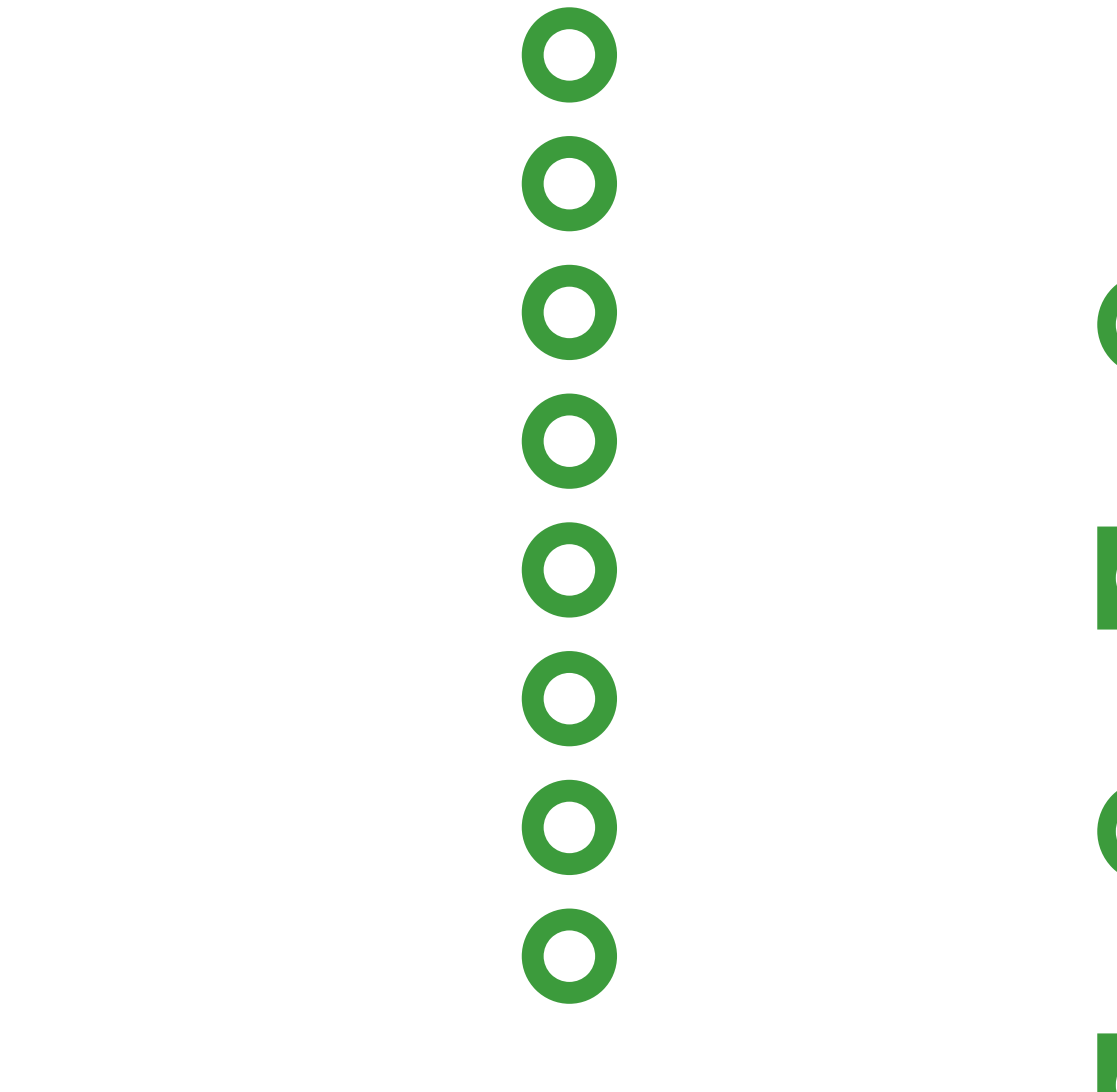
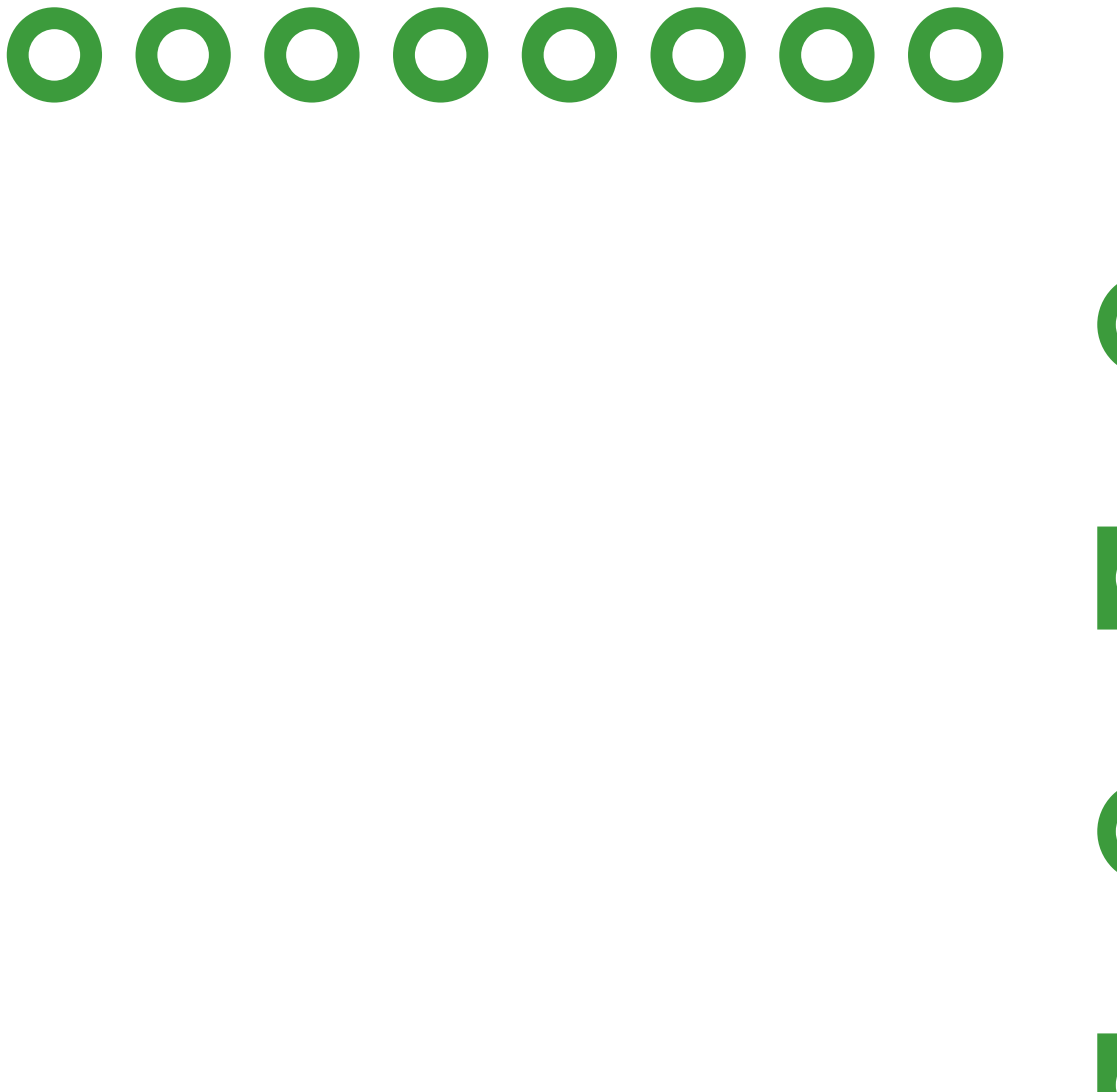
part rotation: 0° (569, 505) -> 90° clockwise (505, 54)

